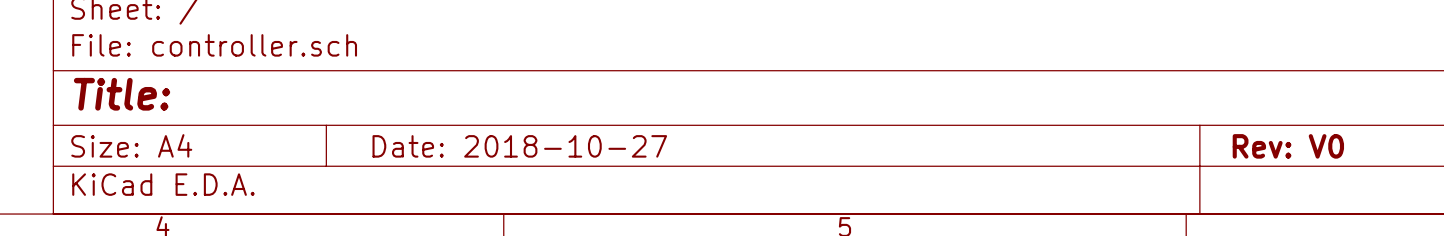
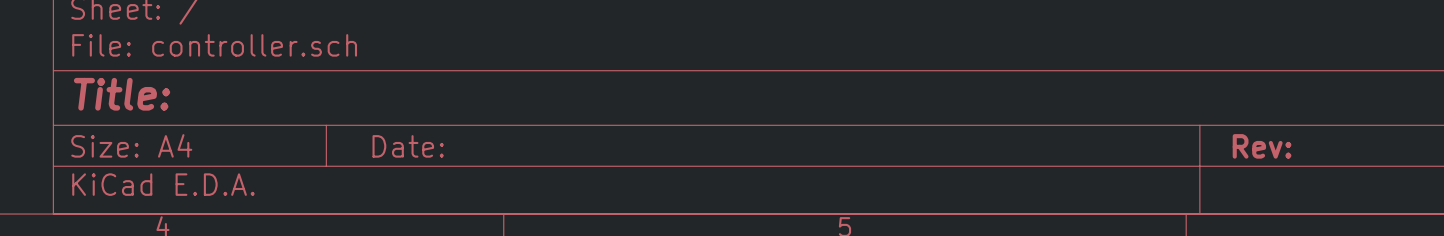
title block: Date: 2018-10-27 (519, 146) -> Date: (408, 146)
title block: Rev: V0 (1288, 146) -> Rev: (1262, 146)

